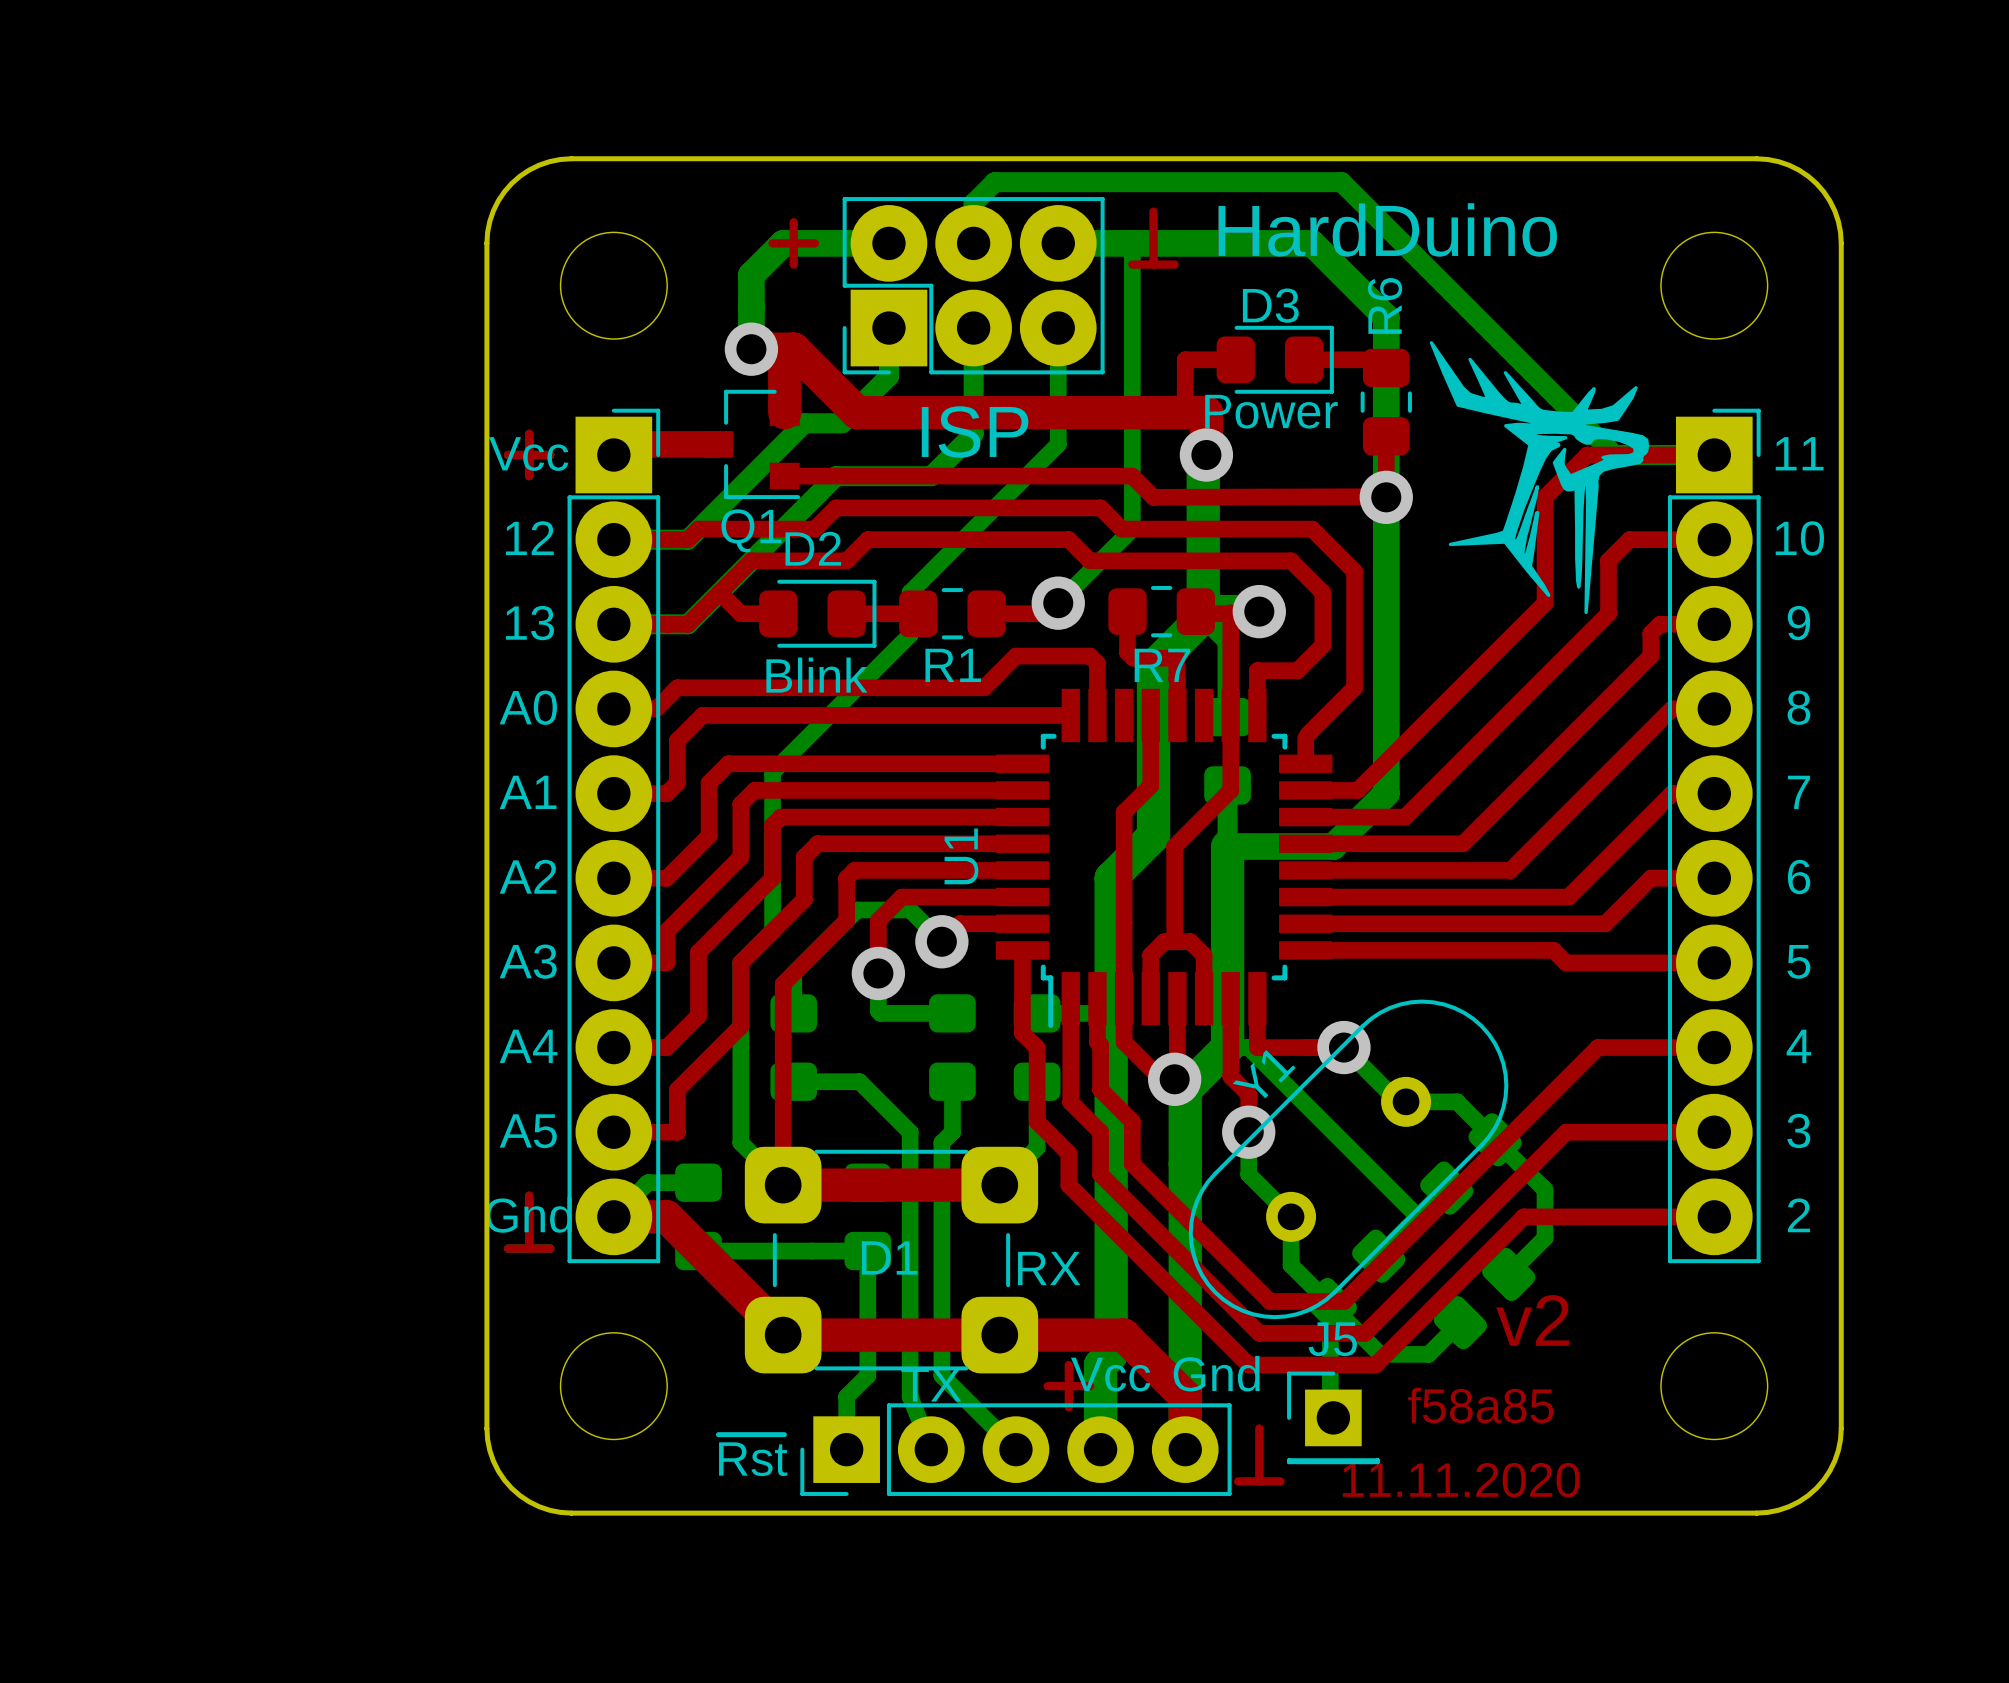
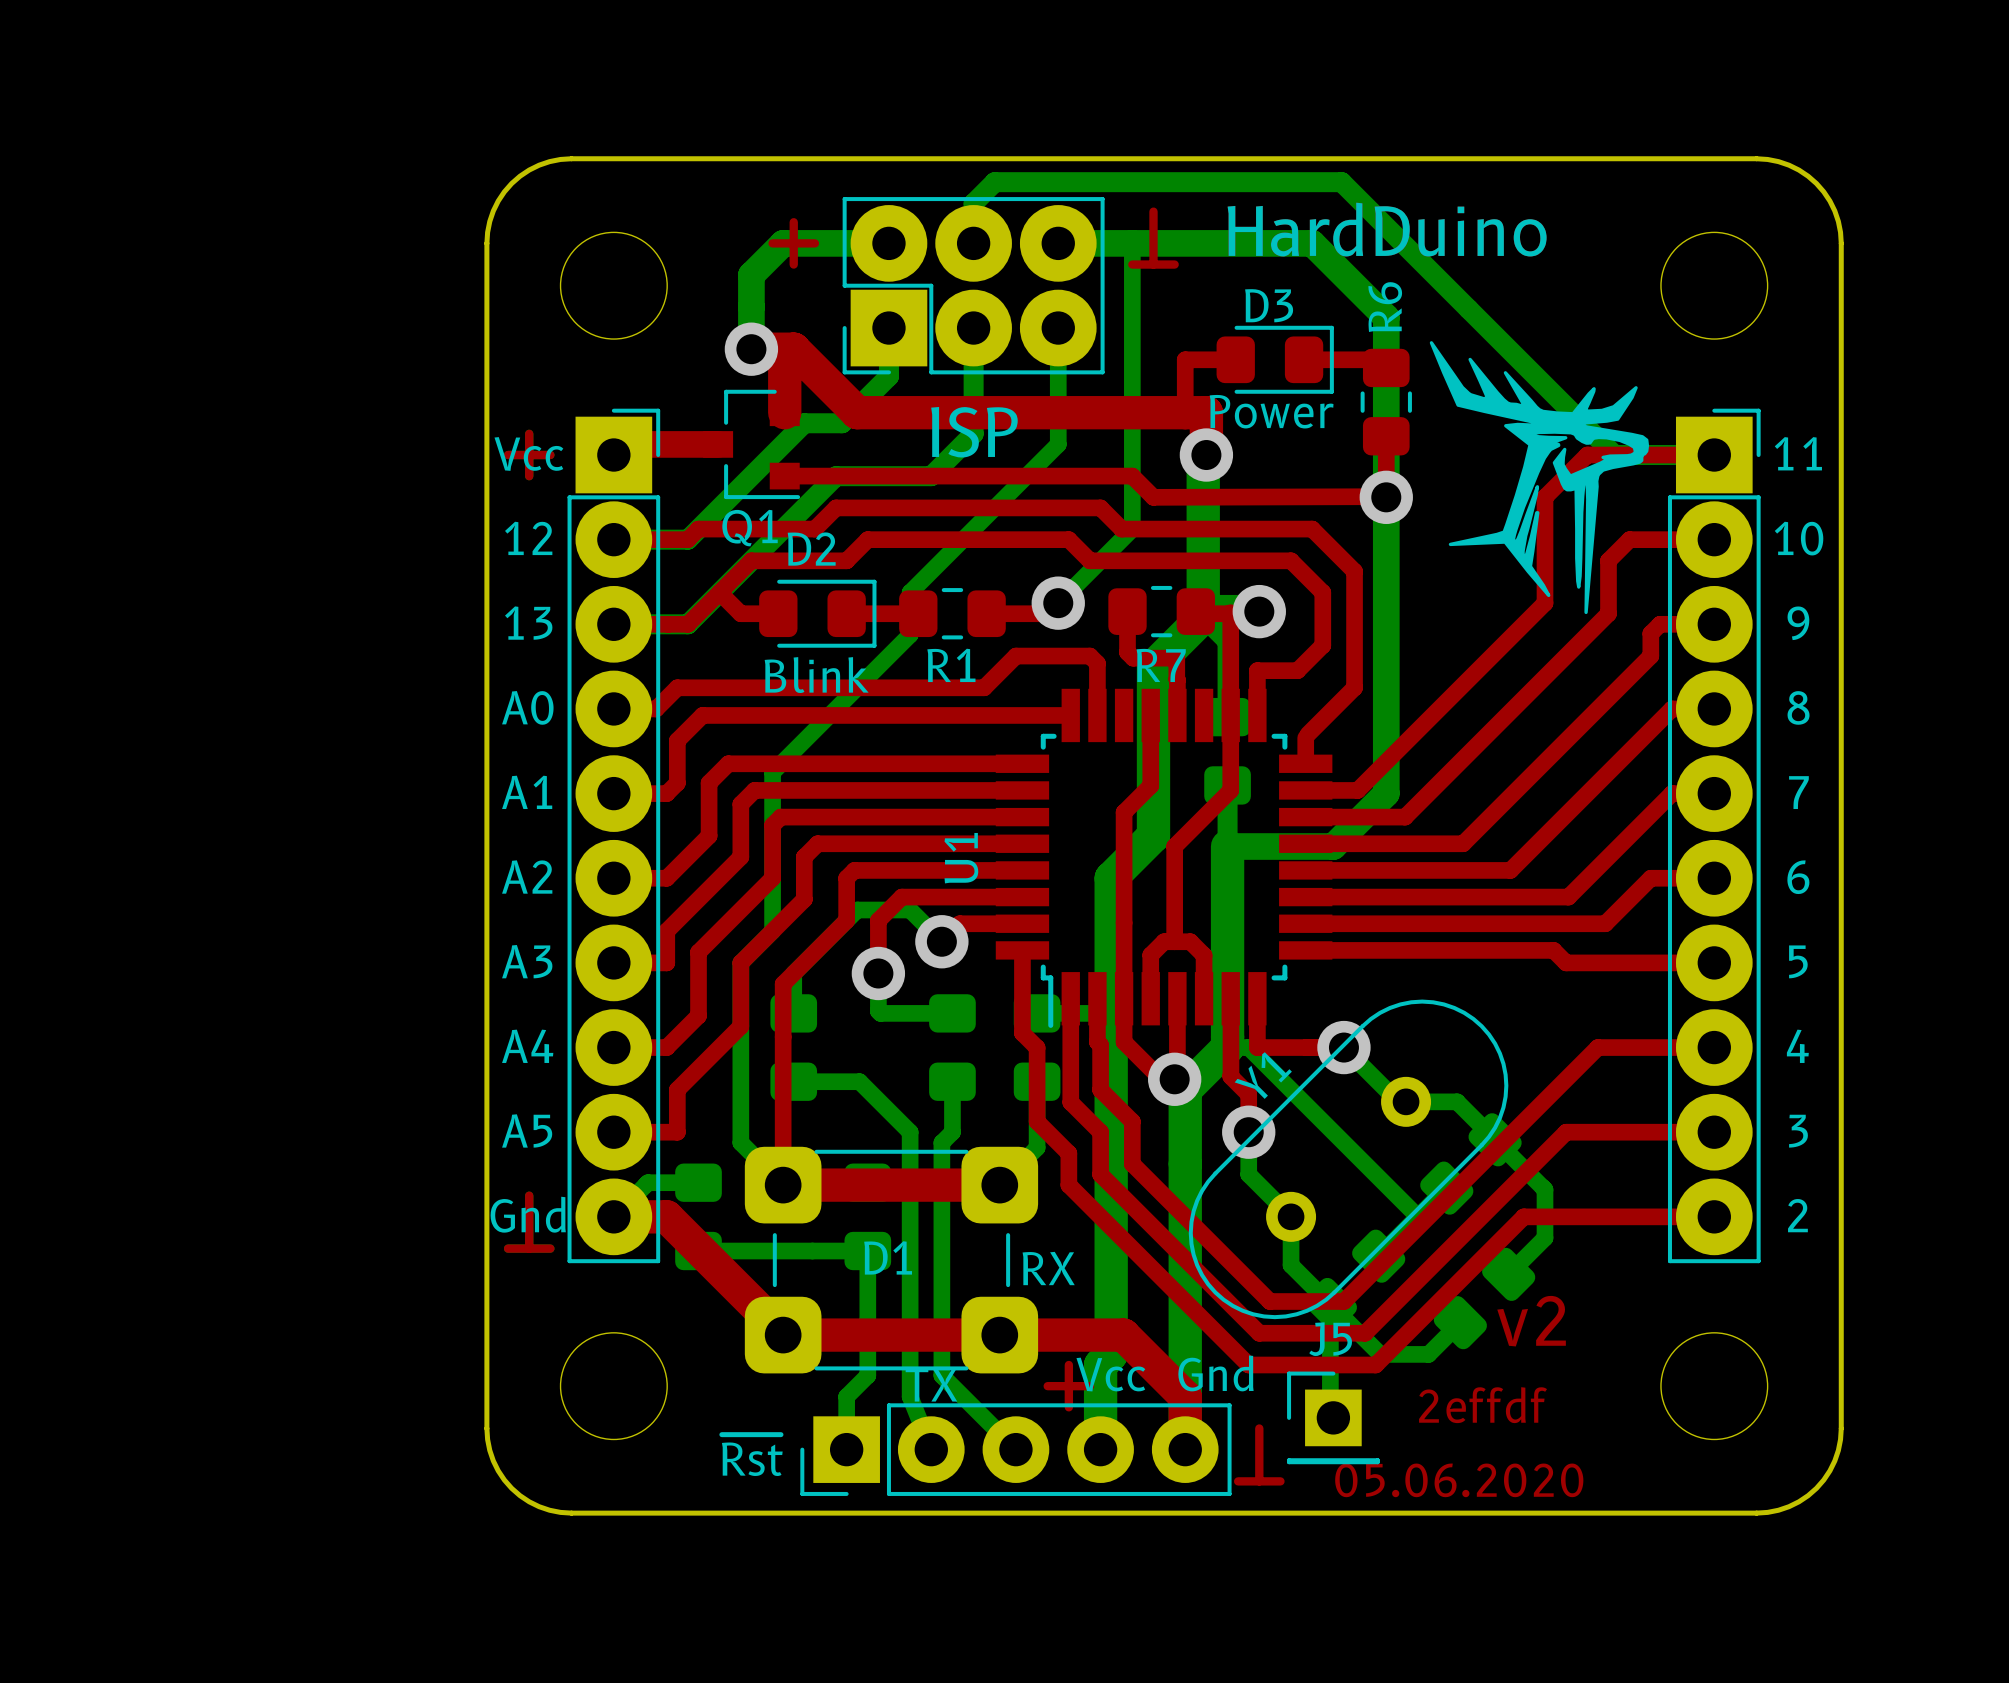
text: f58a85 (1480, 1405) -> 2effdf (1483, 1405)
text: 11.11.2020 (1461, 1480) -> 05.06.2020 (1459, 1480)

